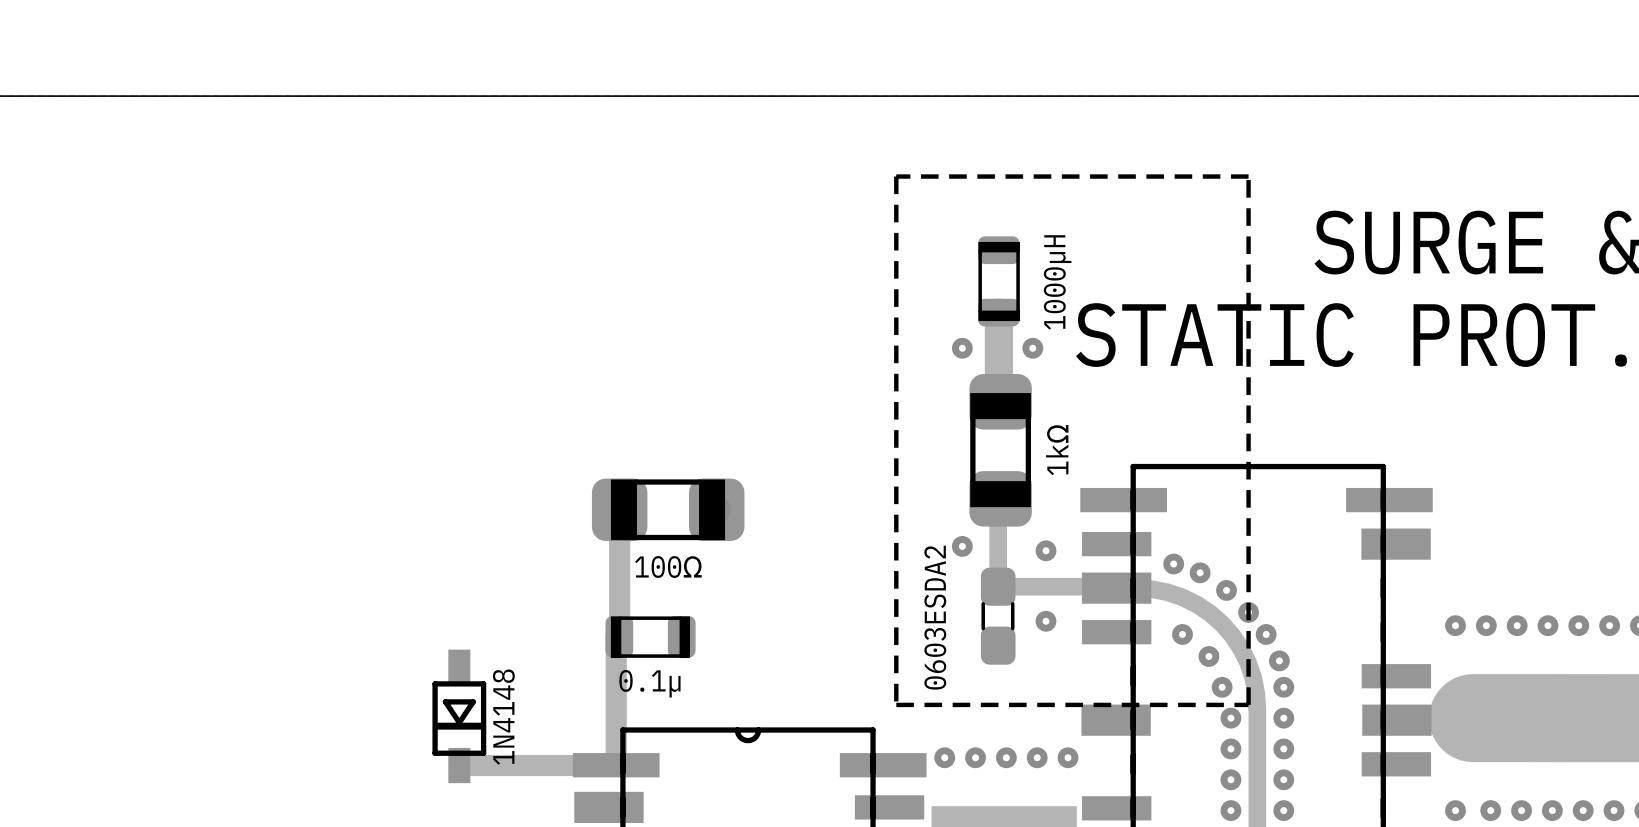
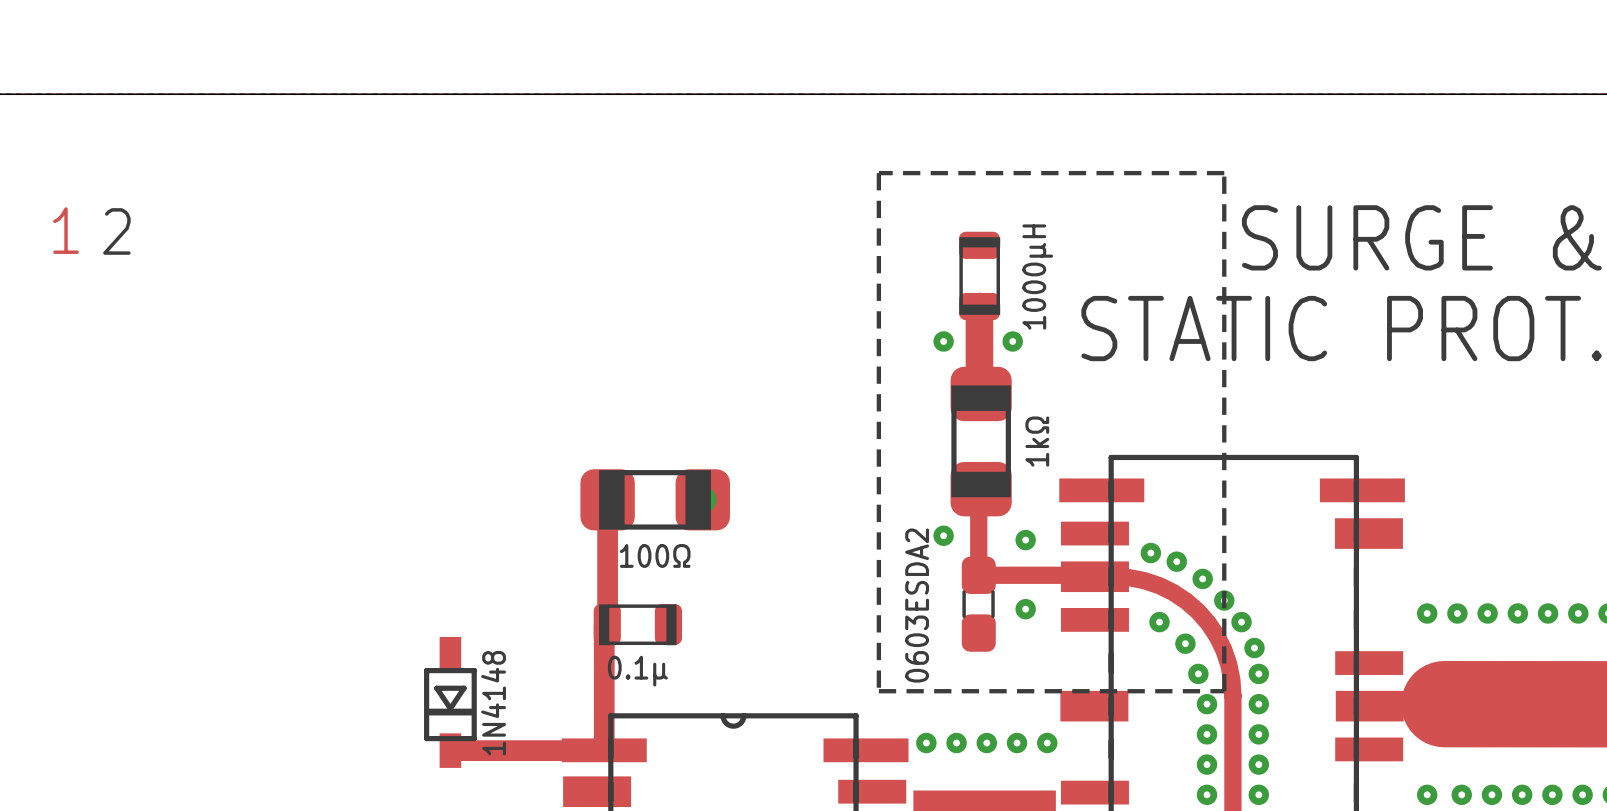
text: none -> 1 (66, 230)
text: none -> 2 (116, 231)

